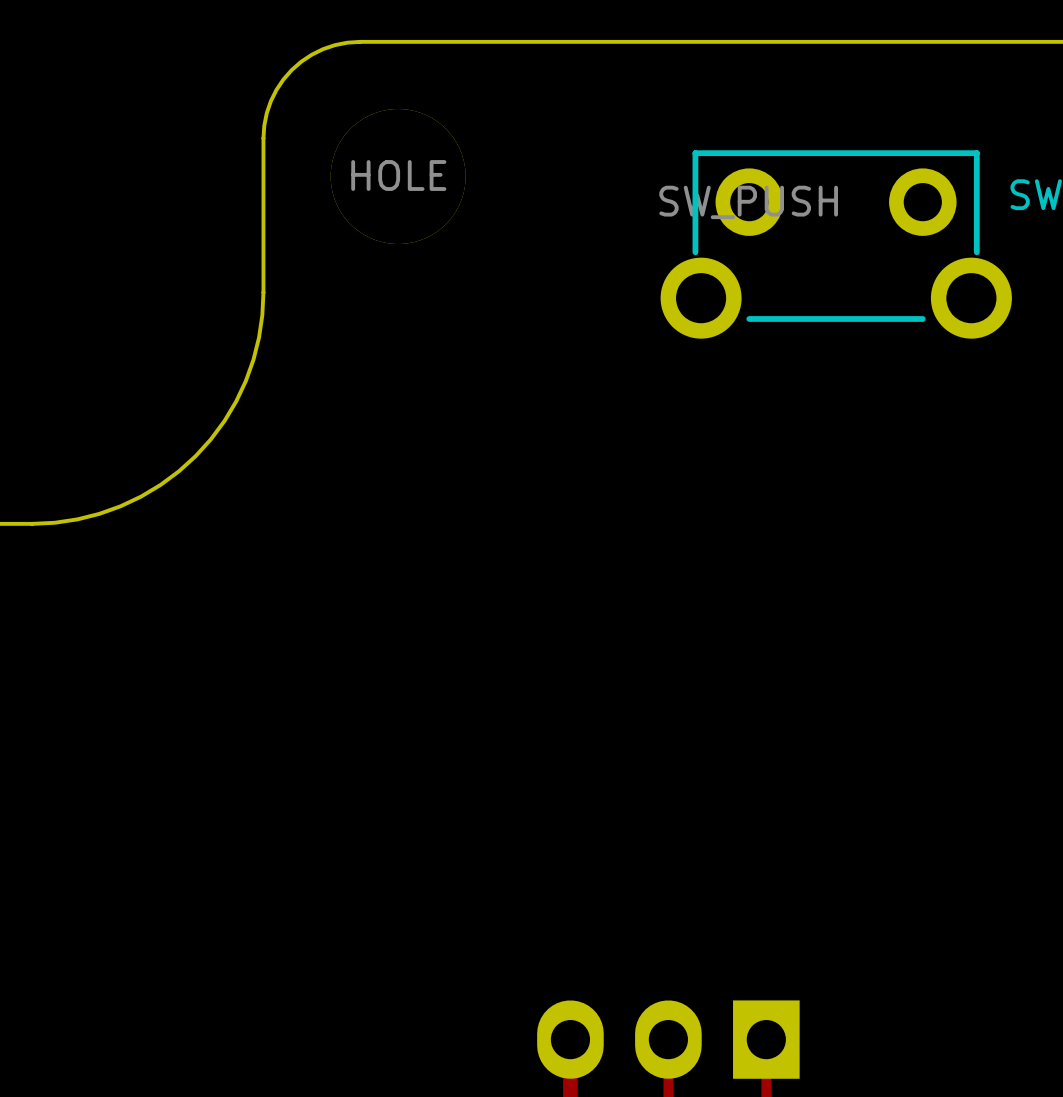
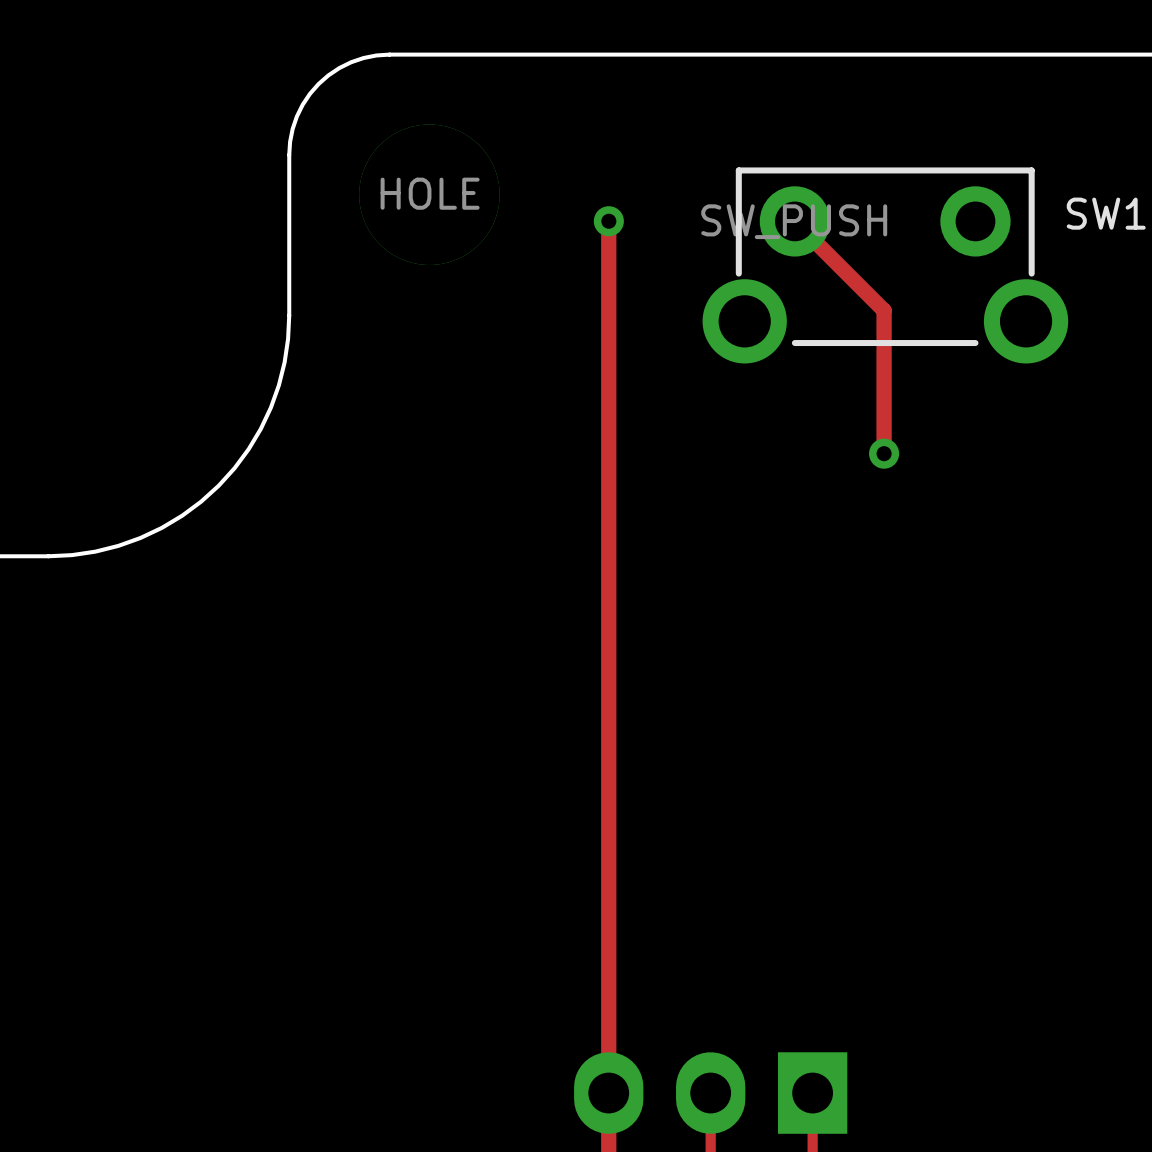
via: none -> (608, 221)
track: none -> (608, 221) (608, 1093)
track: none -> (794, 221) (884, 310) (884, 453)
via: none -> (884, 453)

